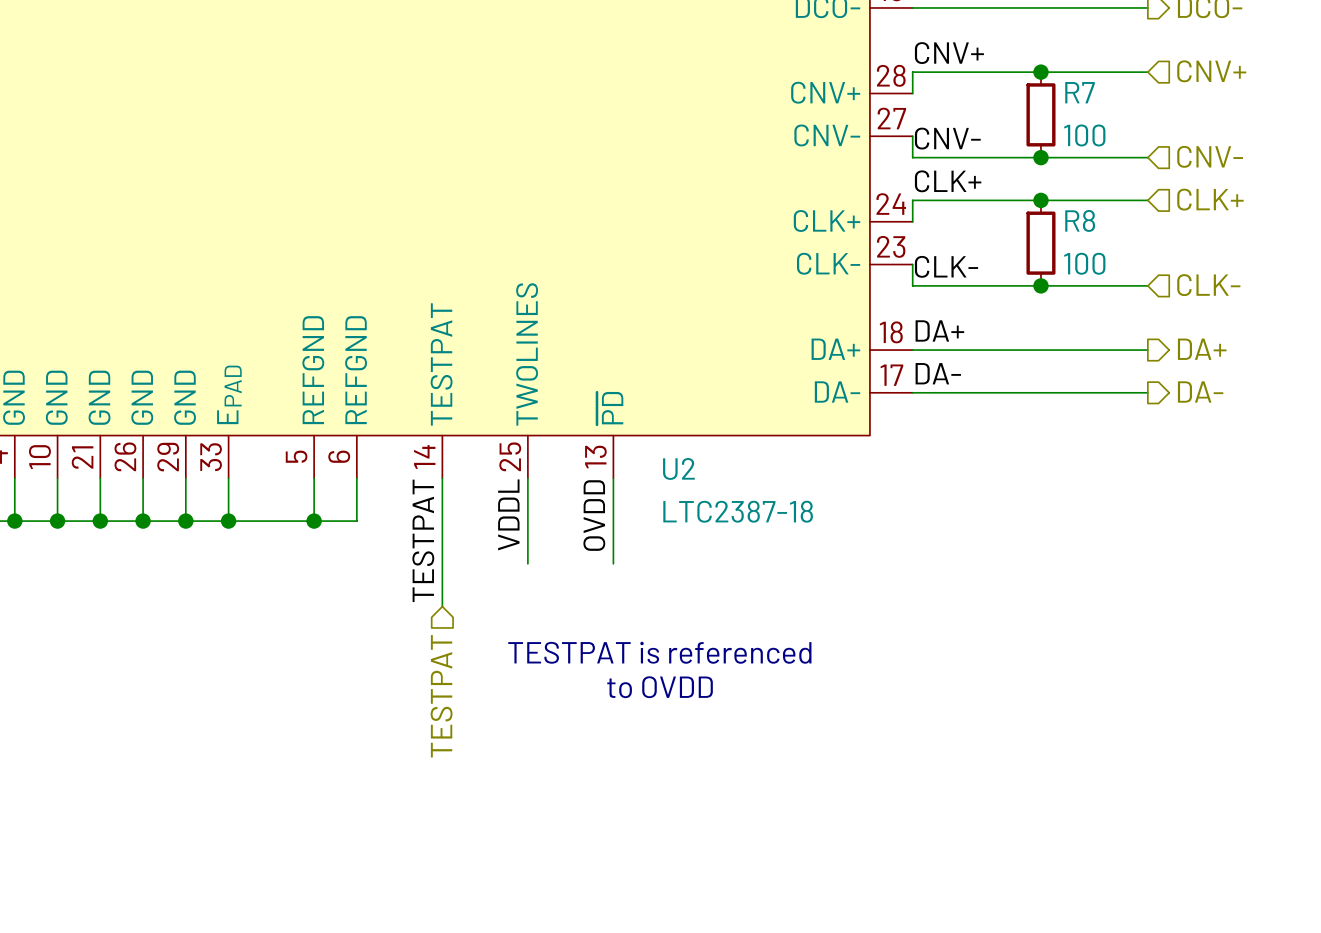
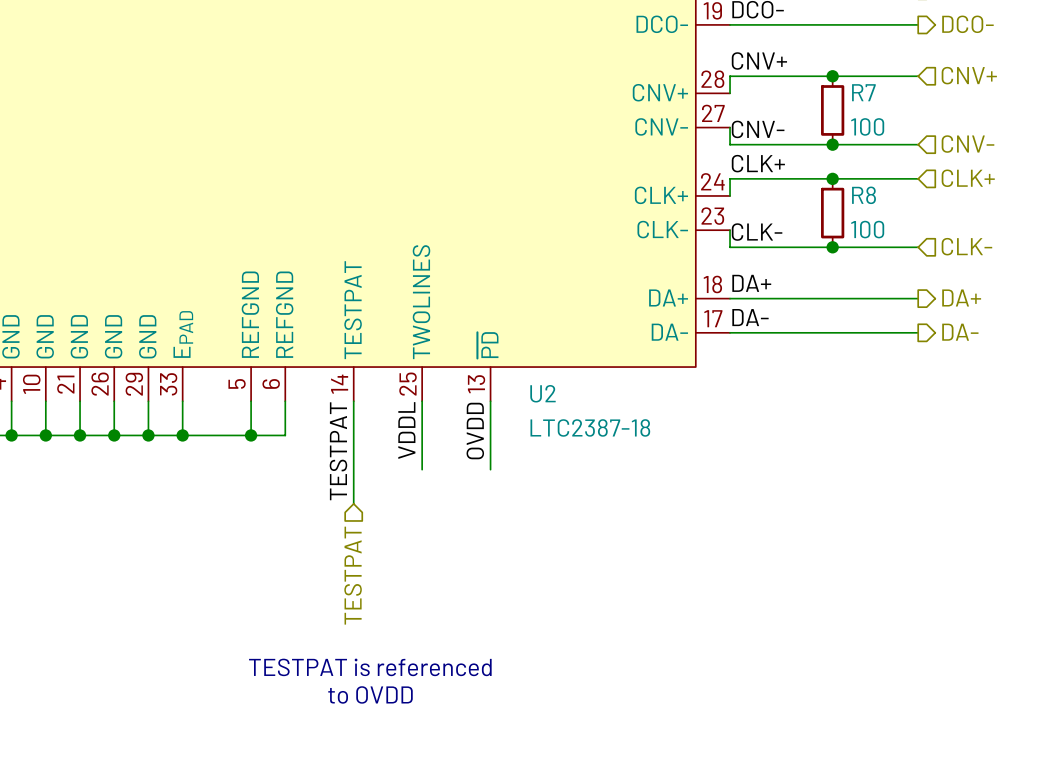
text position: TESTPAT is referenced (659, 652) -> TESTPAT is referenced (370, 667)
text position: to OVDD (660, 687) -> to OVDD (370, 694)

